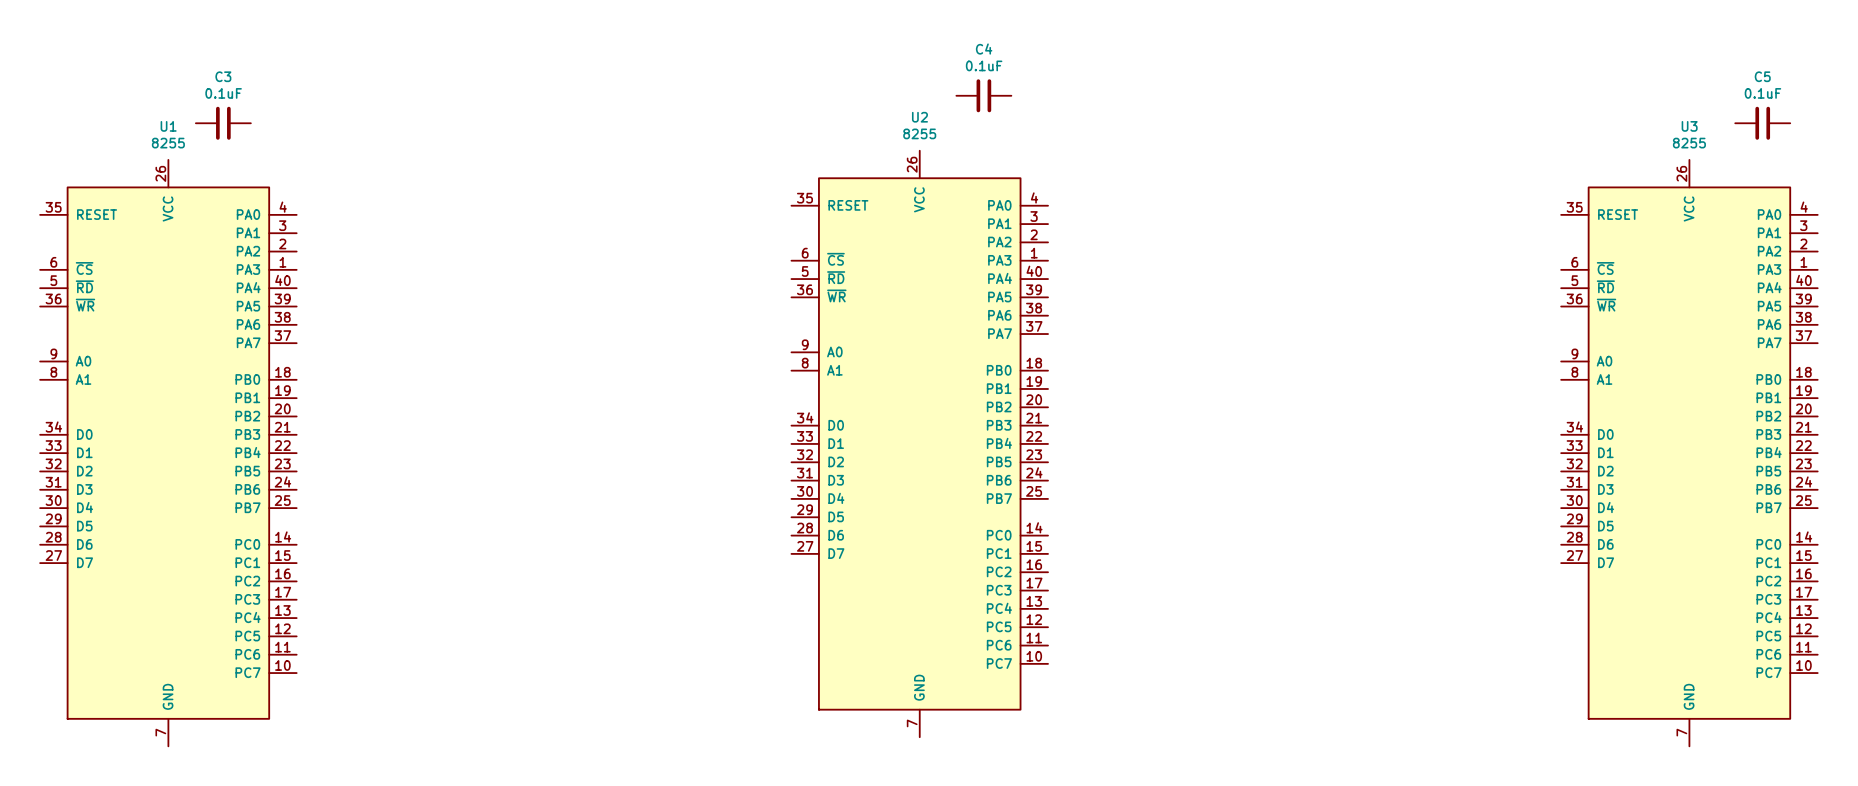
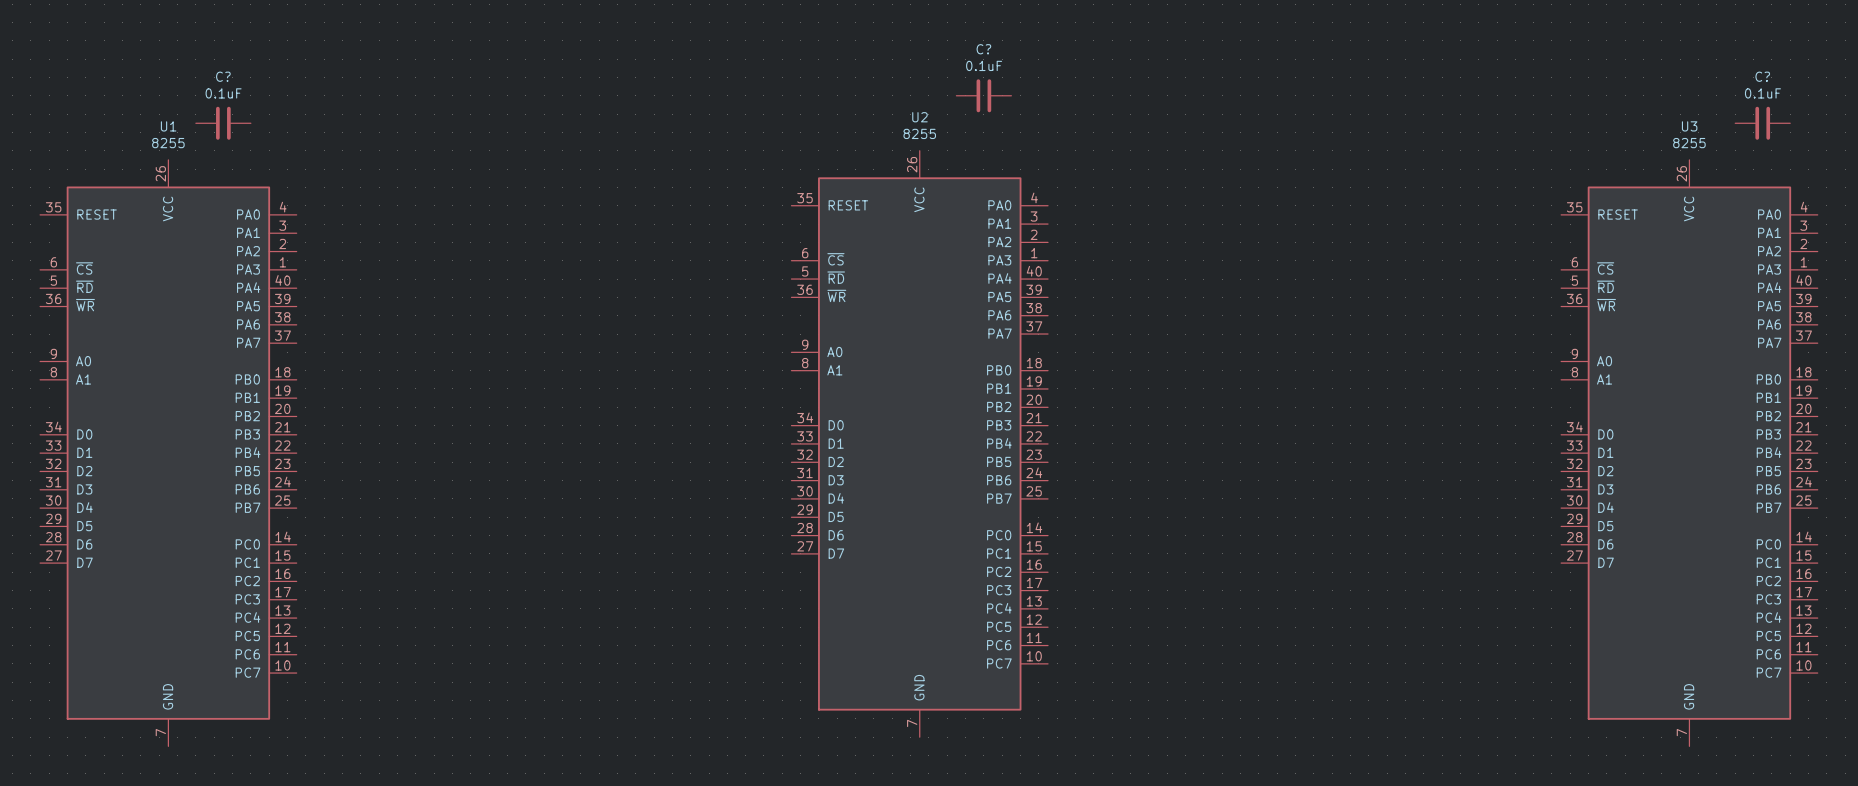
C4 name: C4 (984, 49) -> C? (983, 49)
C3 name: C3 (223, 76) -> C? (223, 76)
C5 name: C5 (1762, 76) -> C? (1762, 76)

